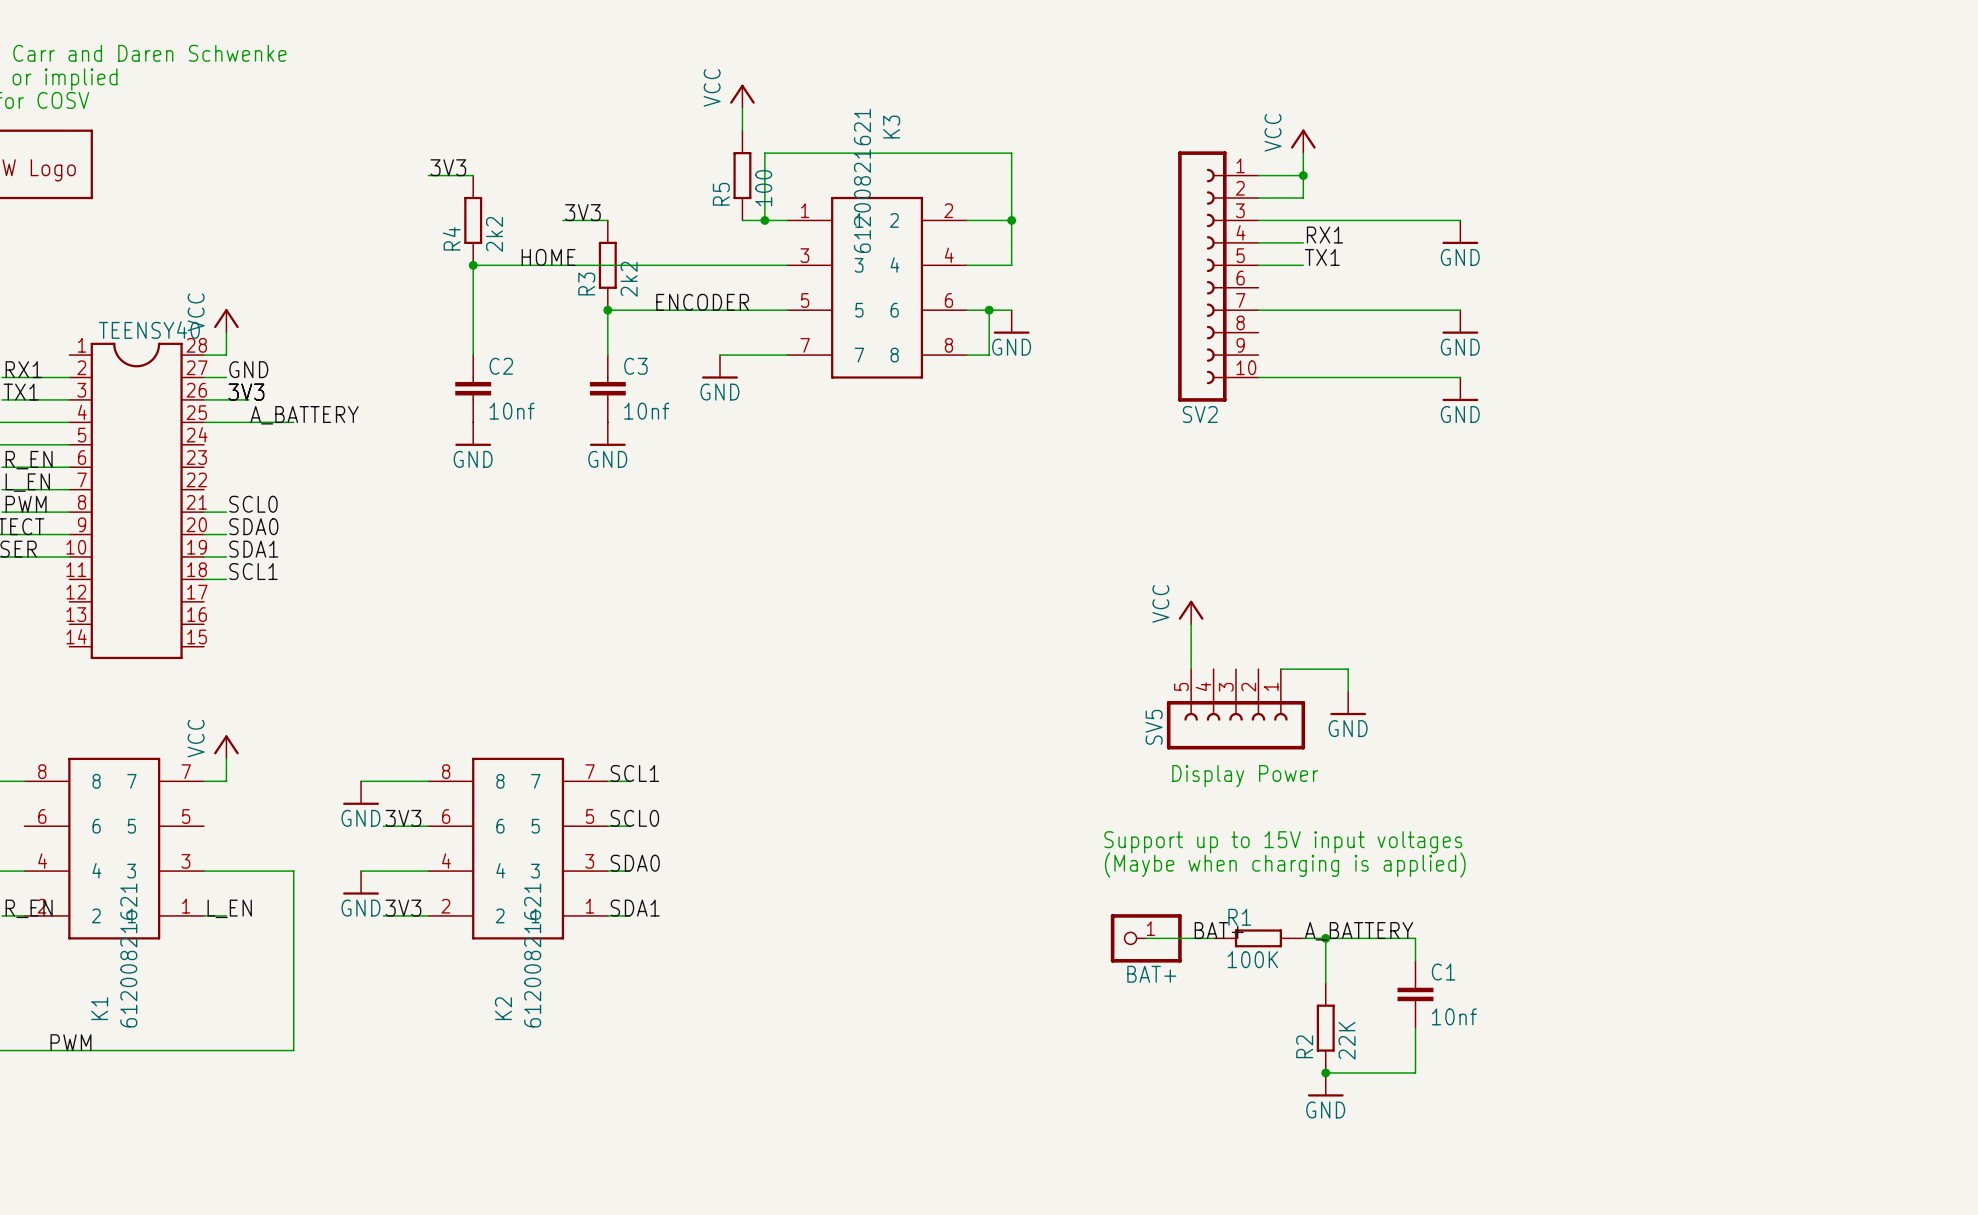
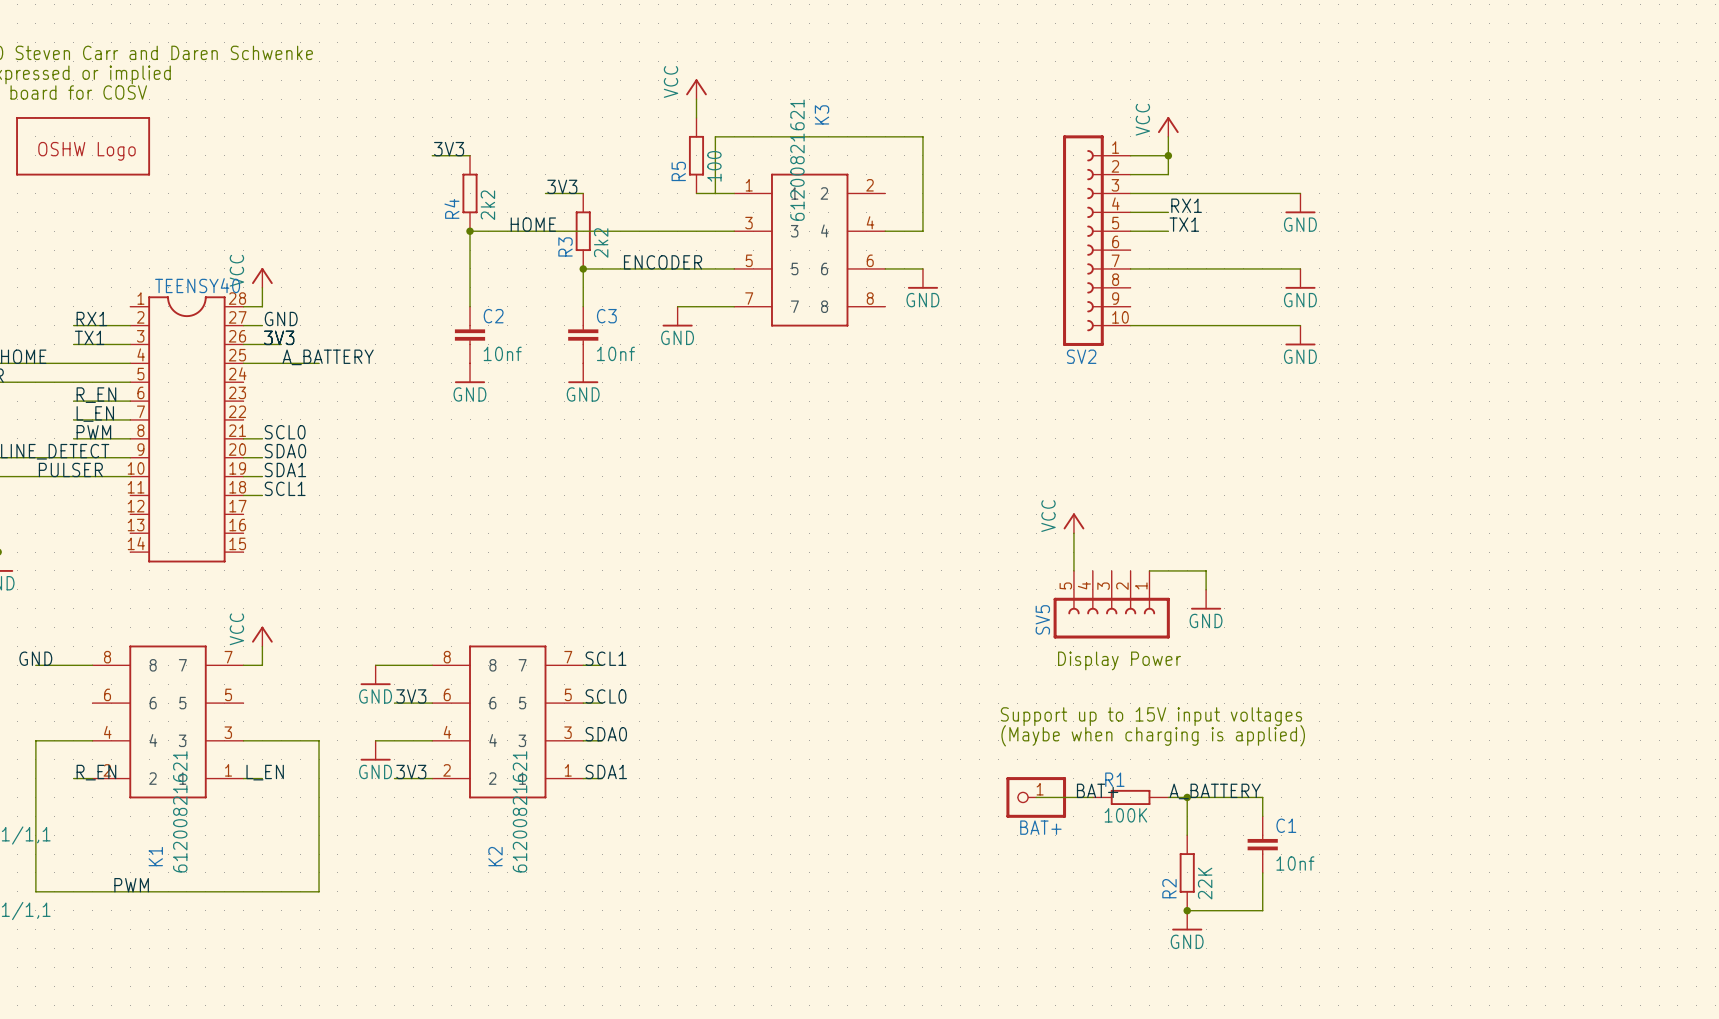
junction: (764, 220) -> none
wire: (966, 220) (1011, 220) -> none
junction: (1011, 220) -> none
wire: (989, 310) (989, 355) (966, 355) -> none
junction: (989, 310) -> none

